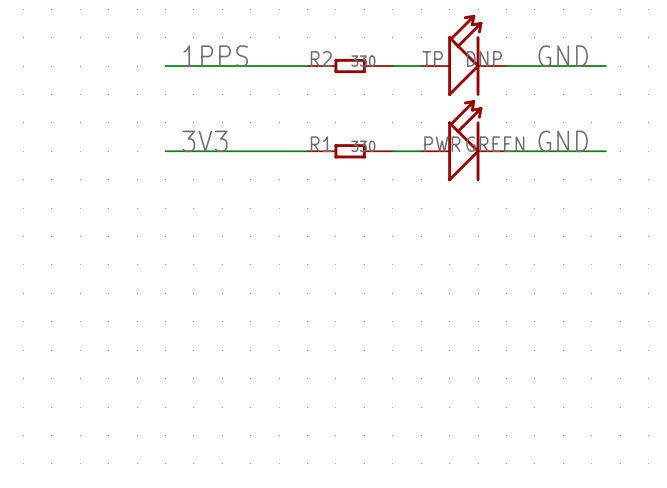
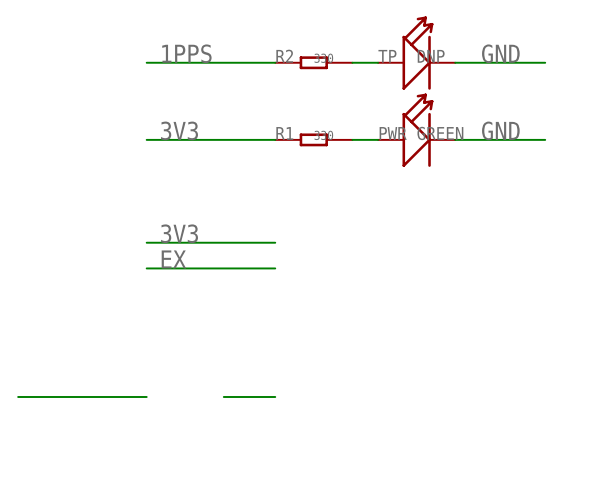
label: none -> 3V3 (179, 233)
wire: none -> (146, 242) (275, 242)
label: none -> EX (173, 259)
wire: none -> (146, 268) (275, 268)
wire: none -> (18, 396) (146, 396)
wire: none -> (223, 396) (275, 396)

